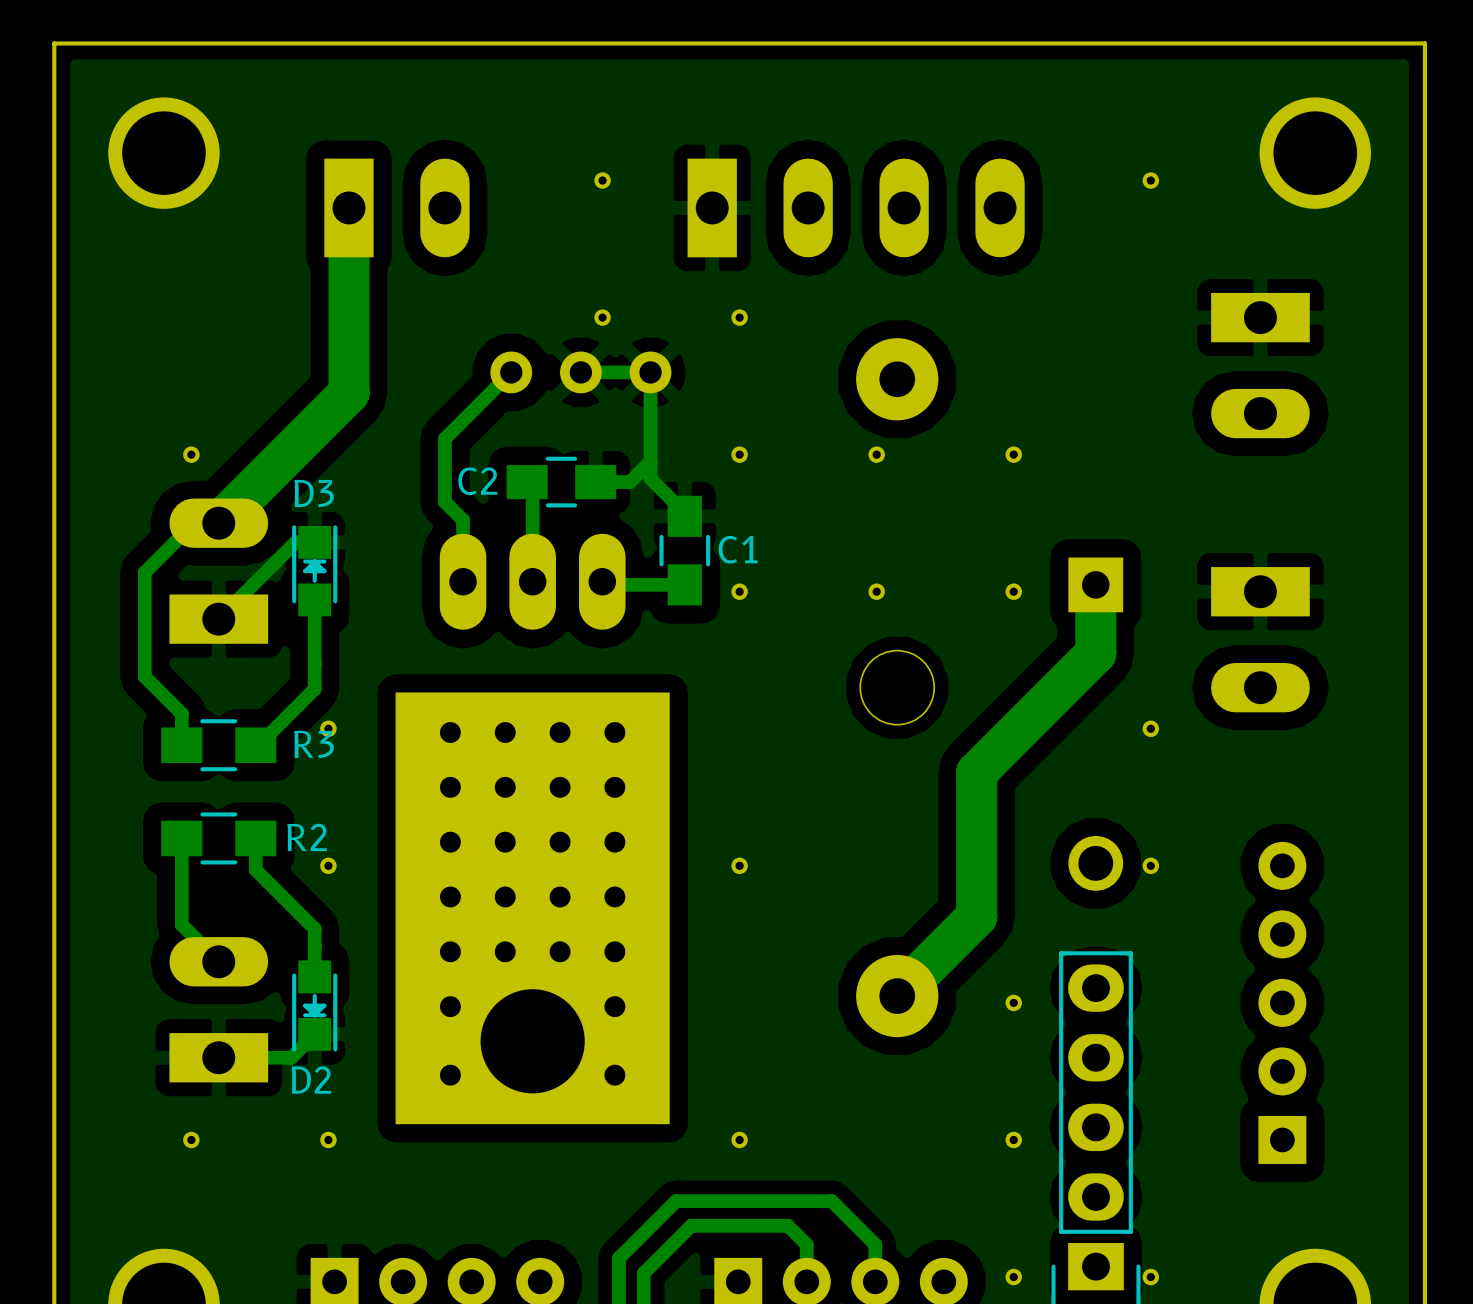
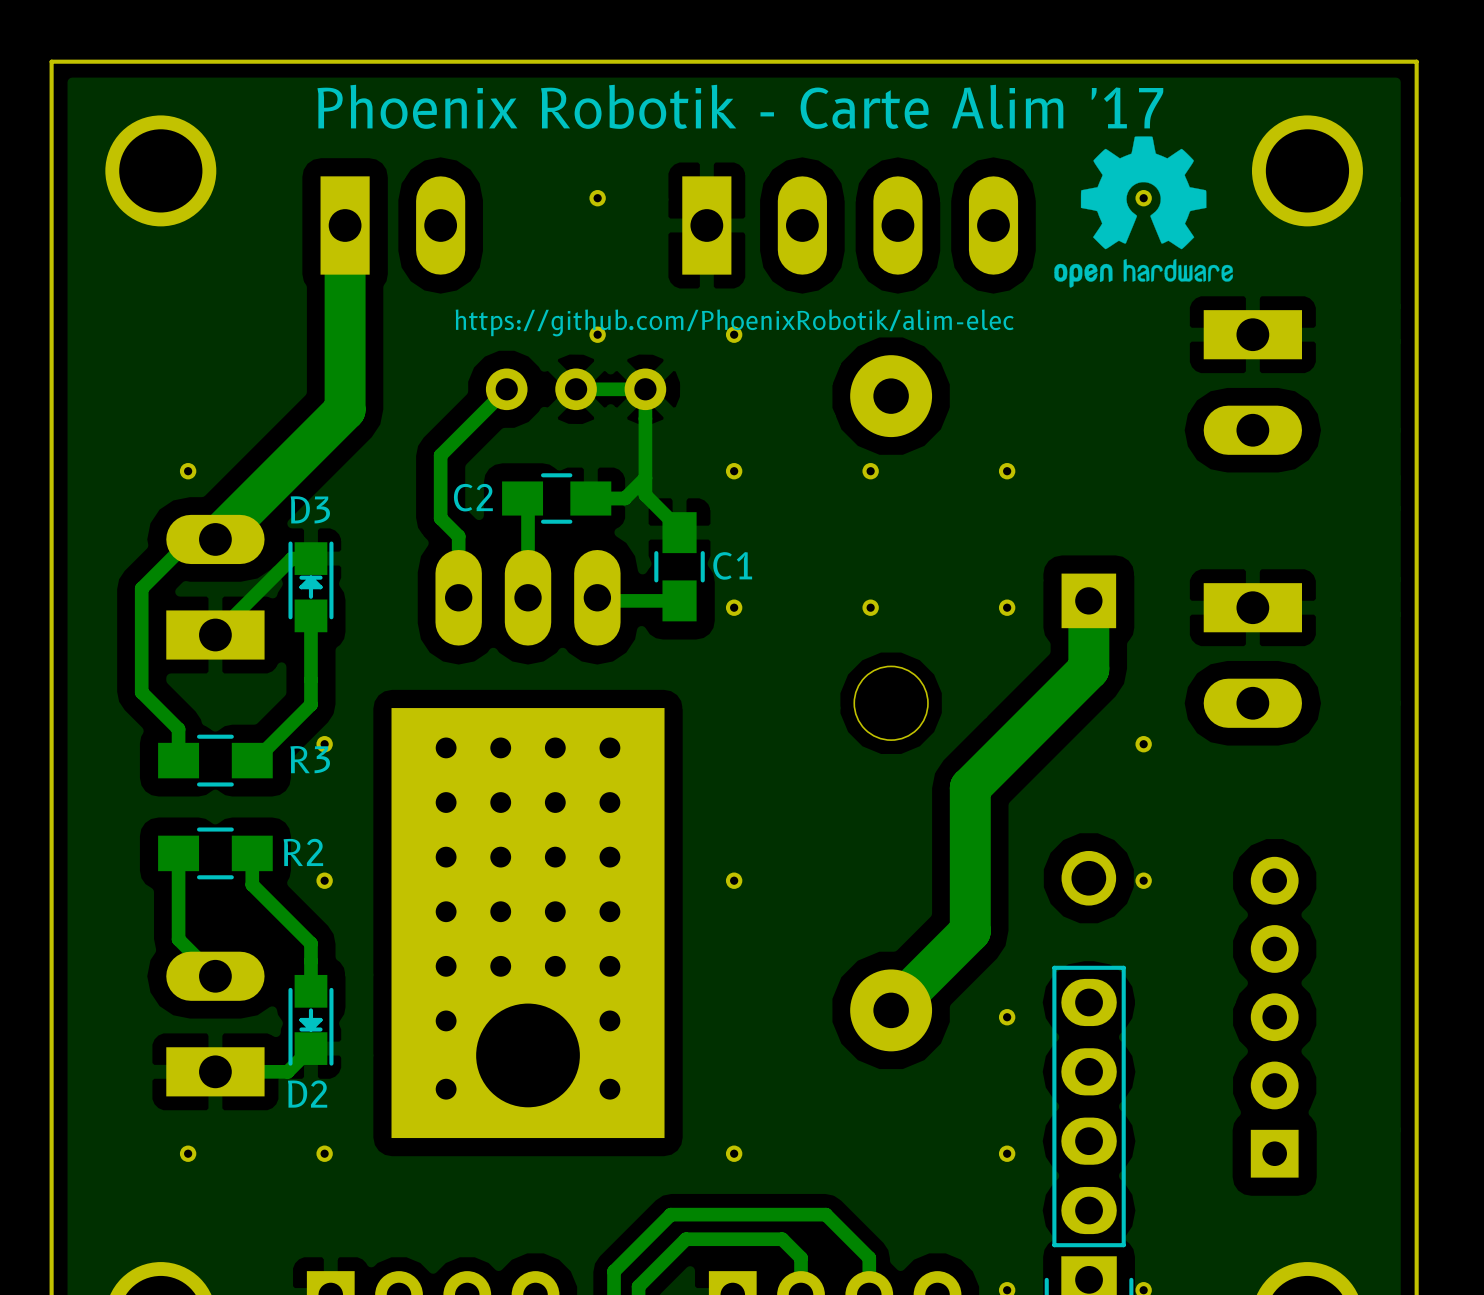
text: none -> Phoenix Robotik - Carte Alim '17 (740, 106)
drawing: none -> [1054, 136, 1233, 288]
text: none -> https://github.com/PhoenixRobotik/alim-elec (734, 322)

